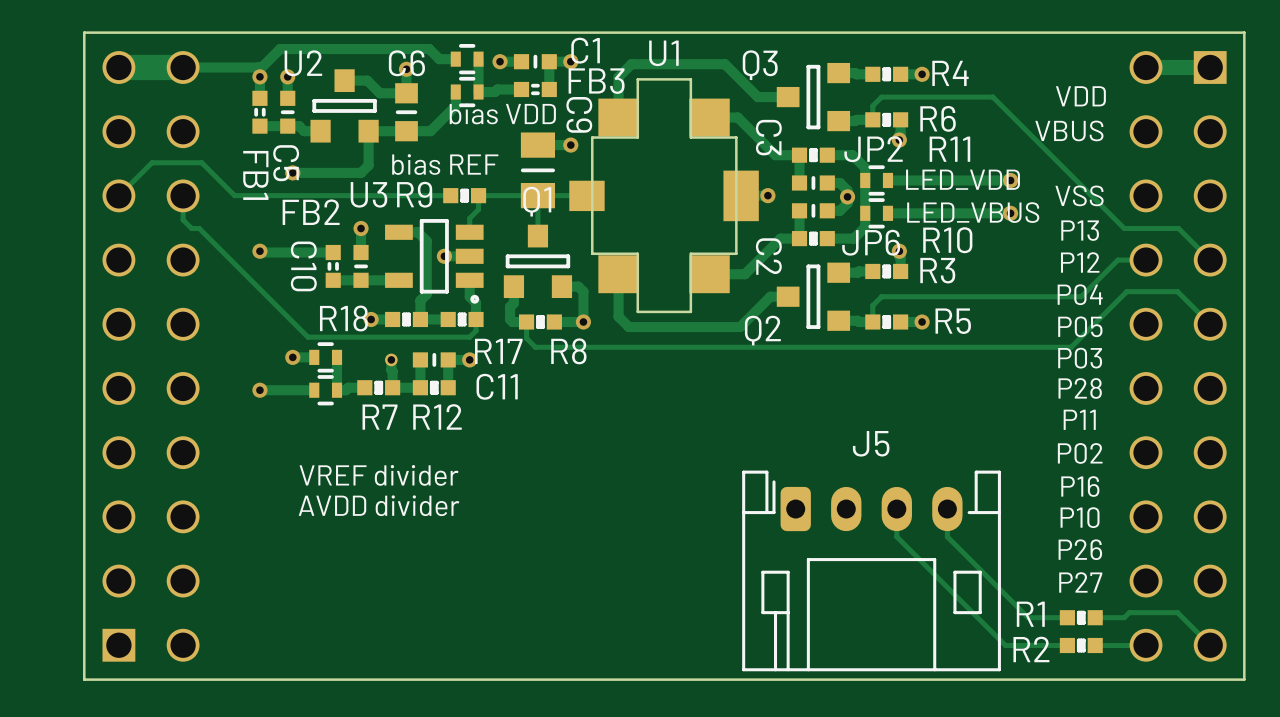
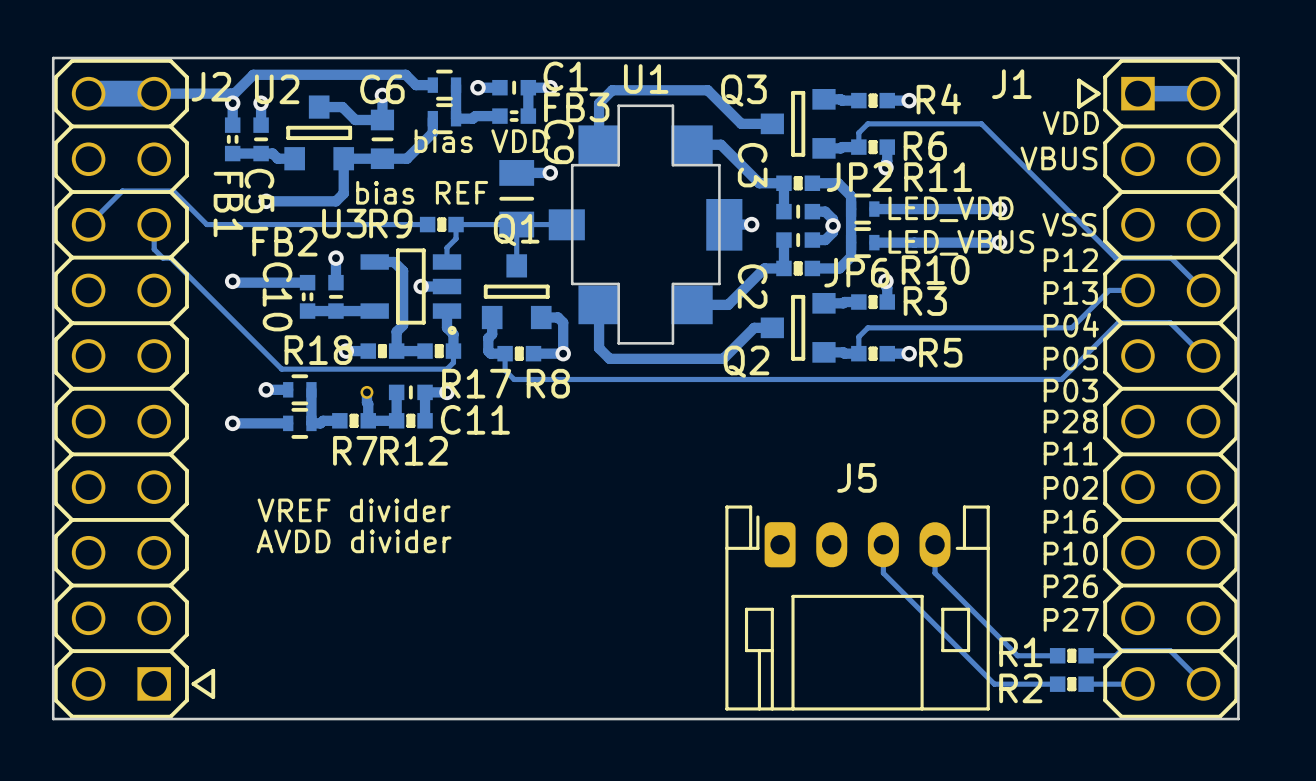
text: P13 (1080, 230) -> P12 (1070, 260)
text: P12 (1080, 262) -> P13 (1070, 292)
J2 side: top (151, 356) -> bottom (134, 388)
J1 side: top (1178, 356) -> bottom (1157, 388)

